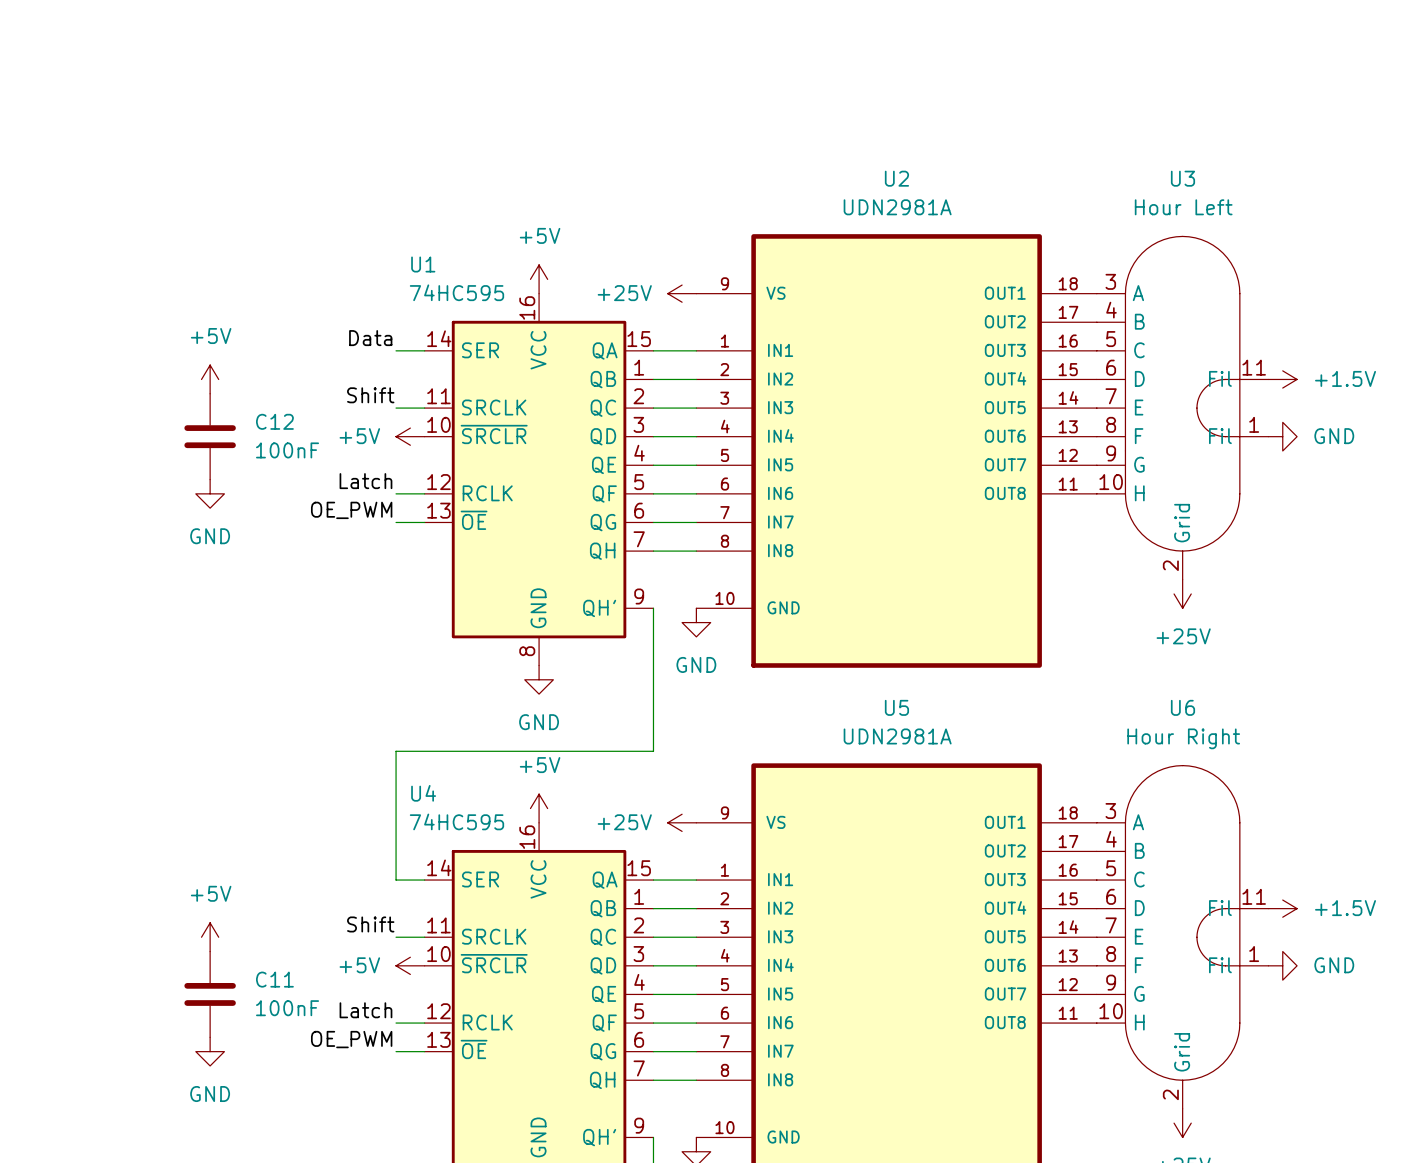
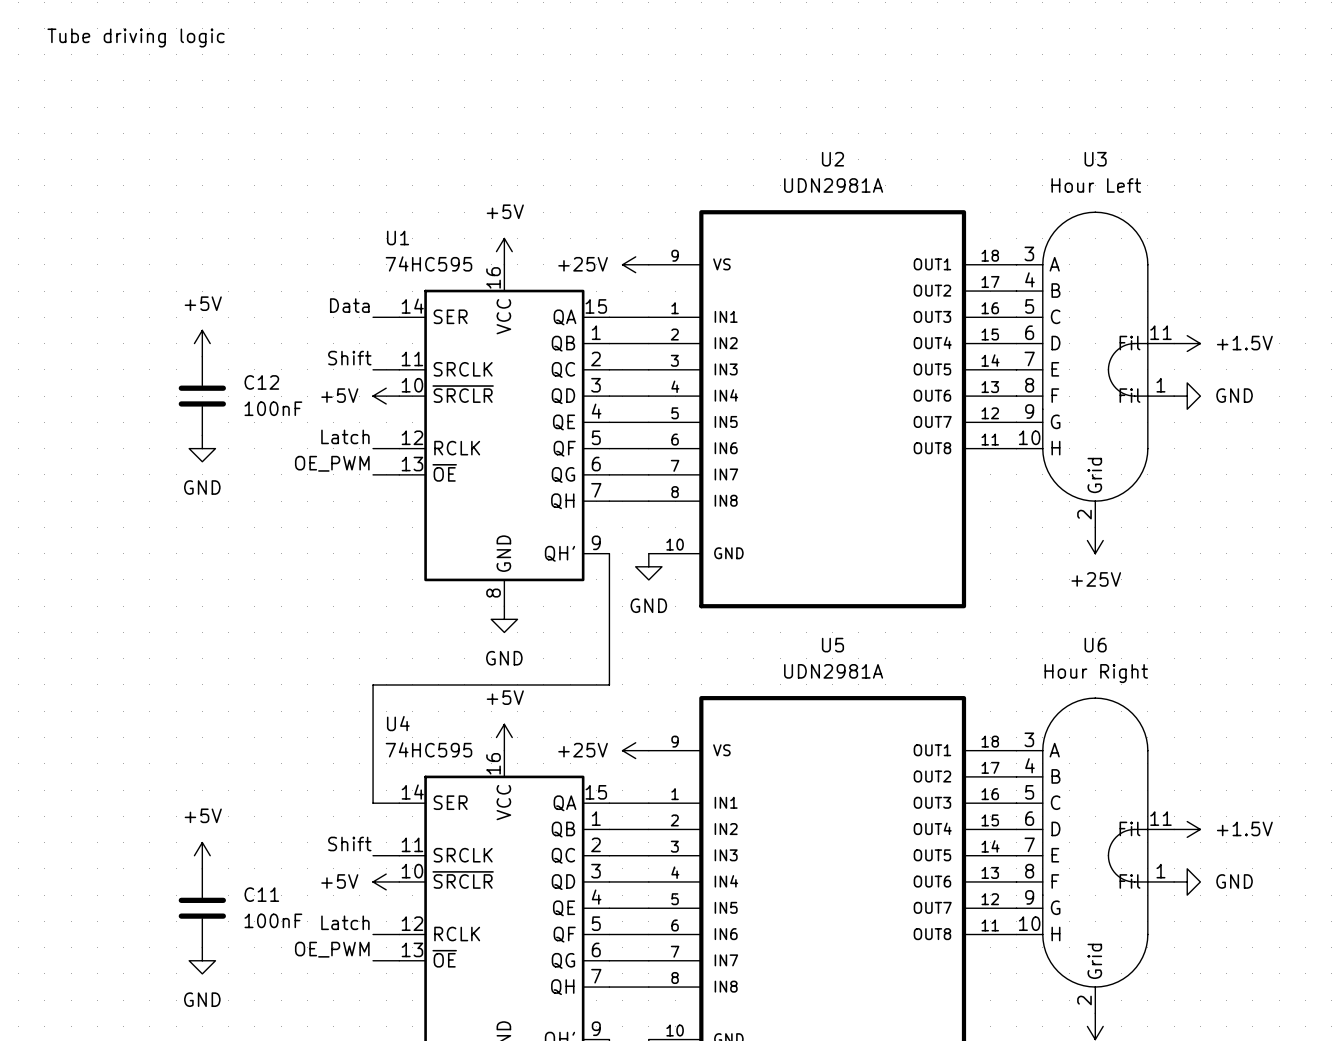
text: none -> Tube driving logic (136, 38)

